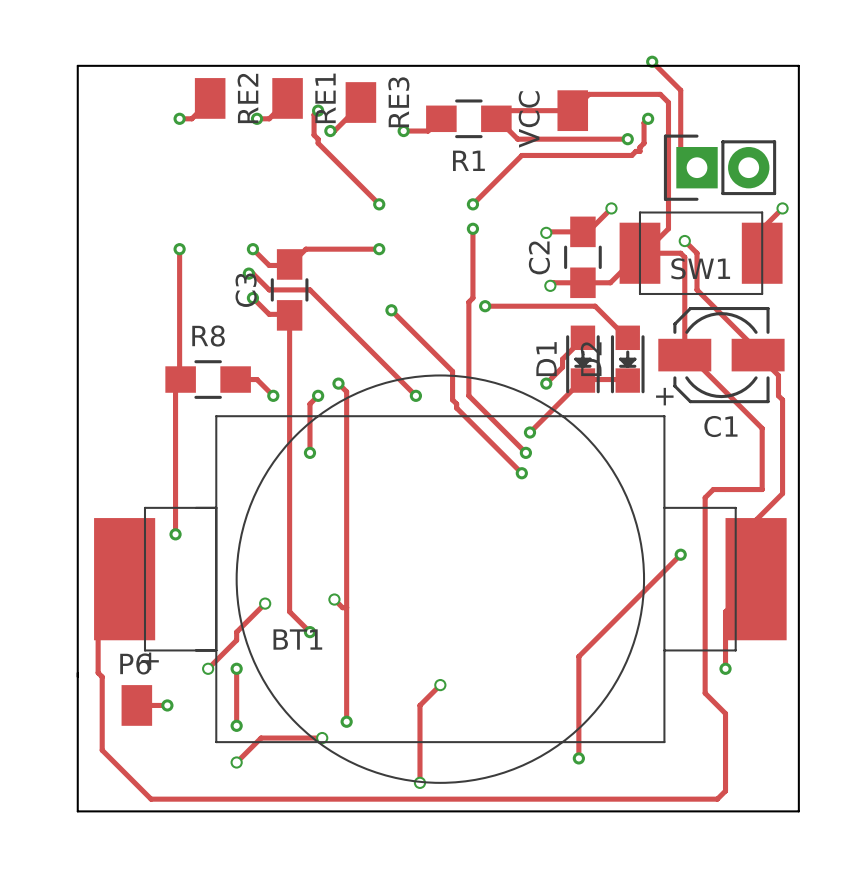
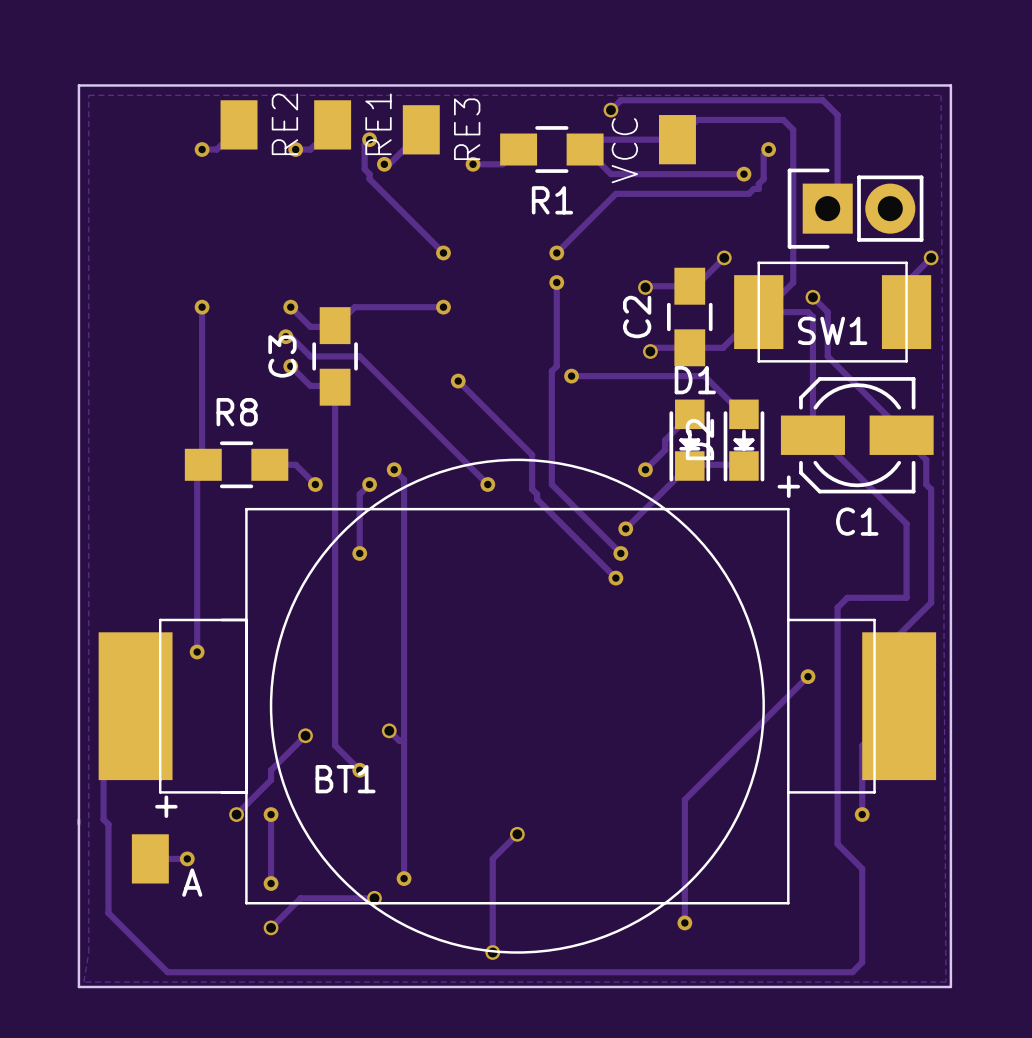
track: (652, 61) (680, 90) (680, 151) -> none
via: (652, 61) -> none
zone outline: none -> (88, 95) (941, 95) (945, 982) (83, 982) (88, 952) (88, 95)
track: none -> (610, 110) (620, 100) (822, 100) (837, 115) (837, 198) (827, 208)
via: none -> (610, 110)
D1 name rotation: 0° (546, 359) -> 90° clockwise (695, 380)
D1 name position: D1 (546, 359) -> D1 (695, 380)
P6 name: P6 (135, 663) -> A (192, 882)

